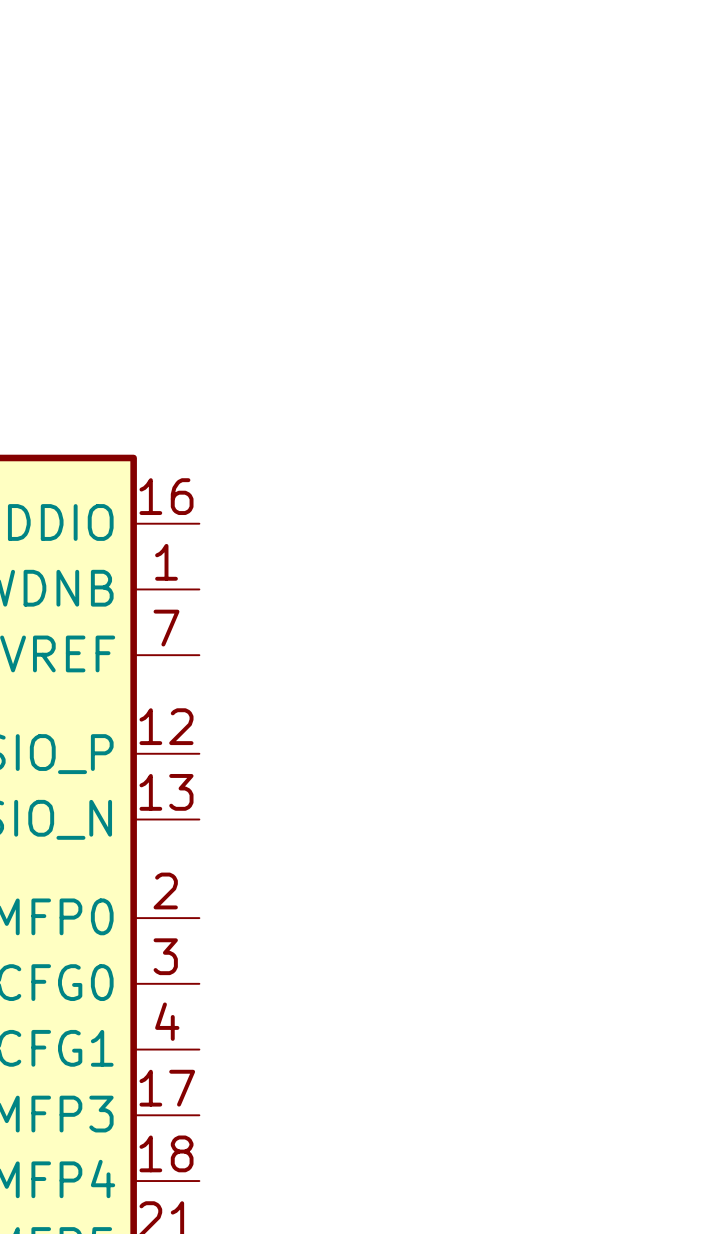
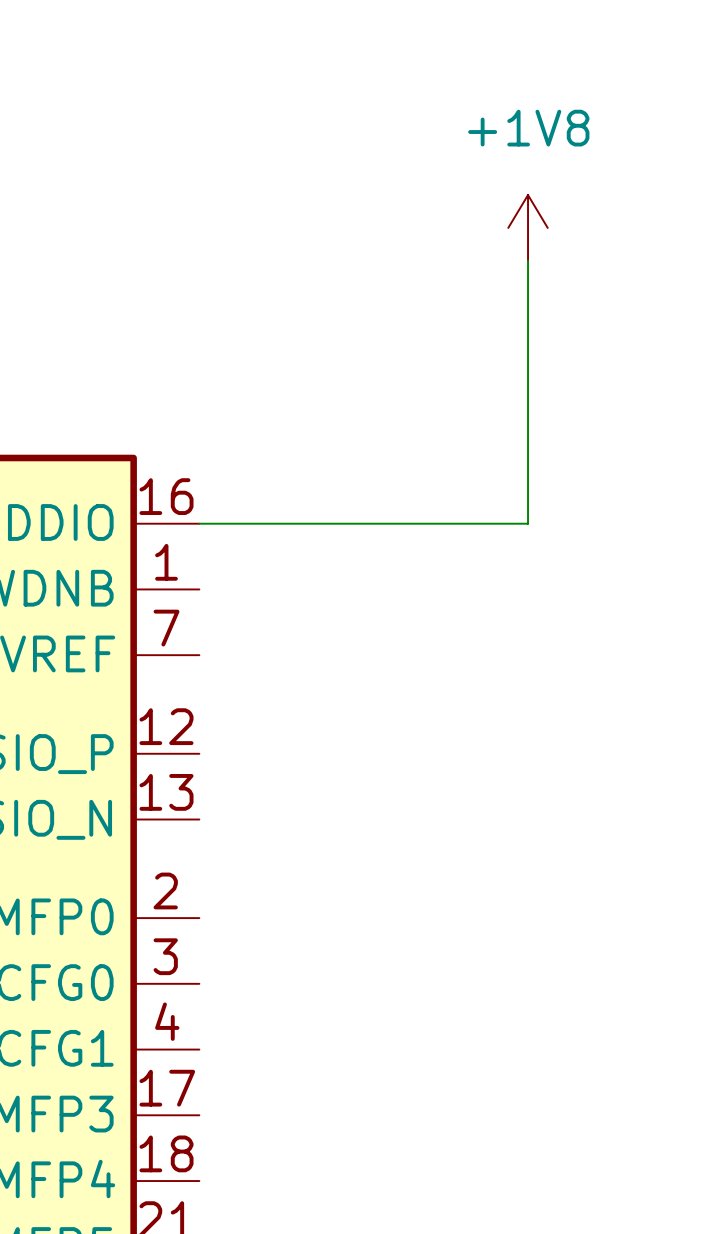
power symbol: none -> +1V8 (528, 227)
wire: none -> (528, 260) (528, 523) (199, 523)

